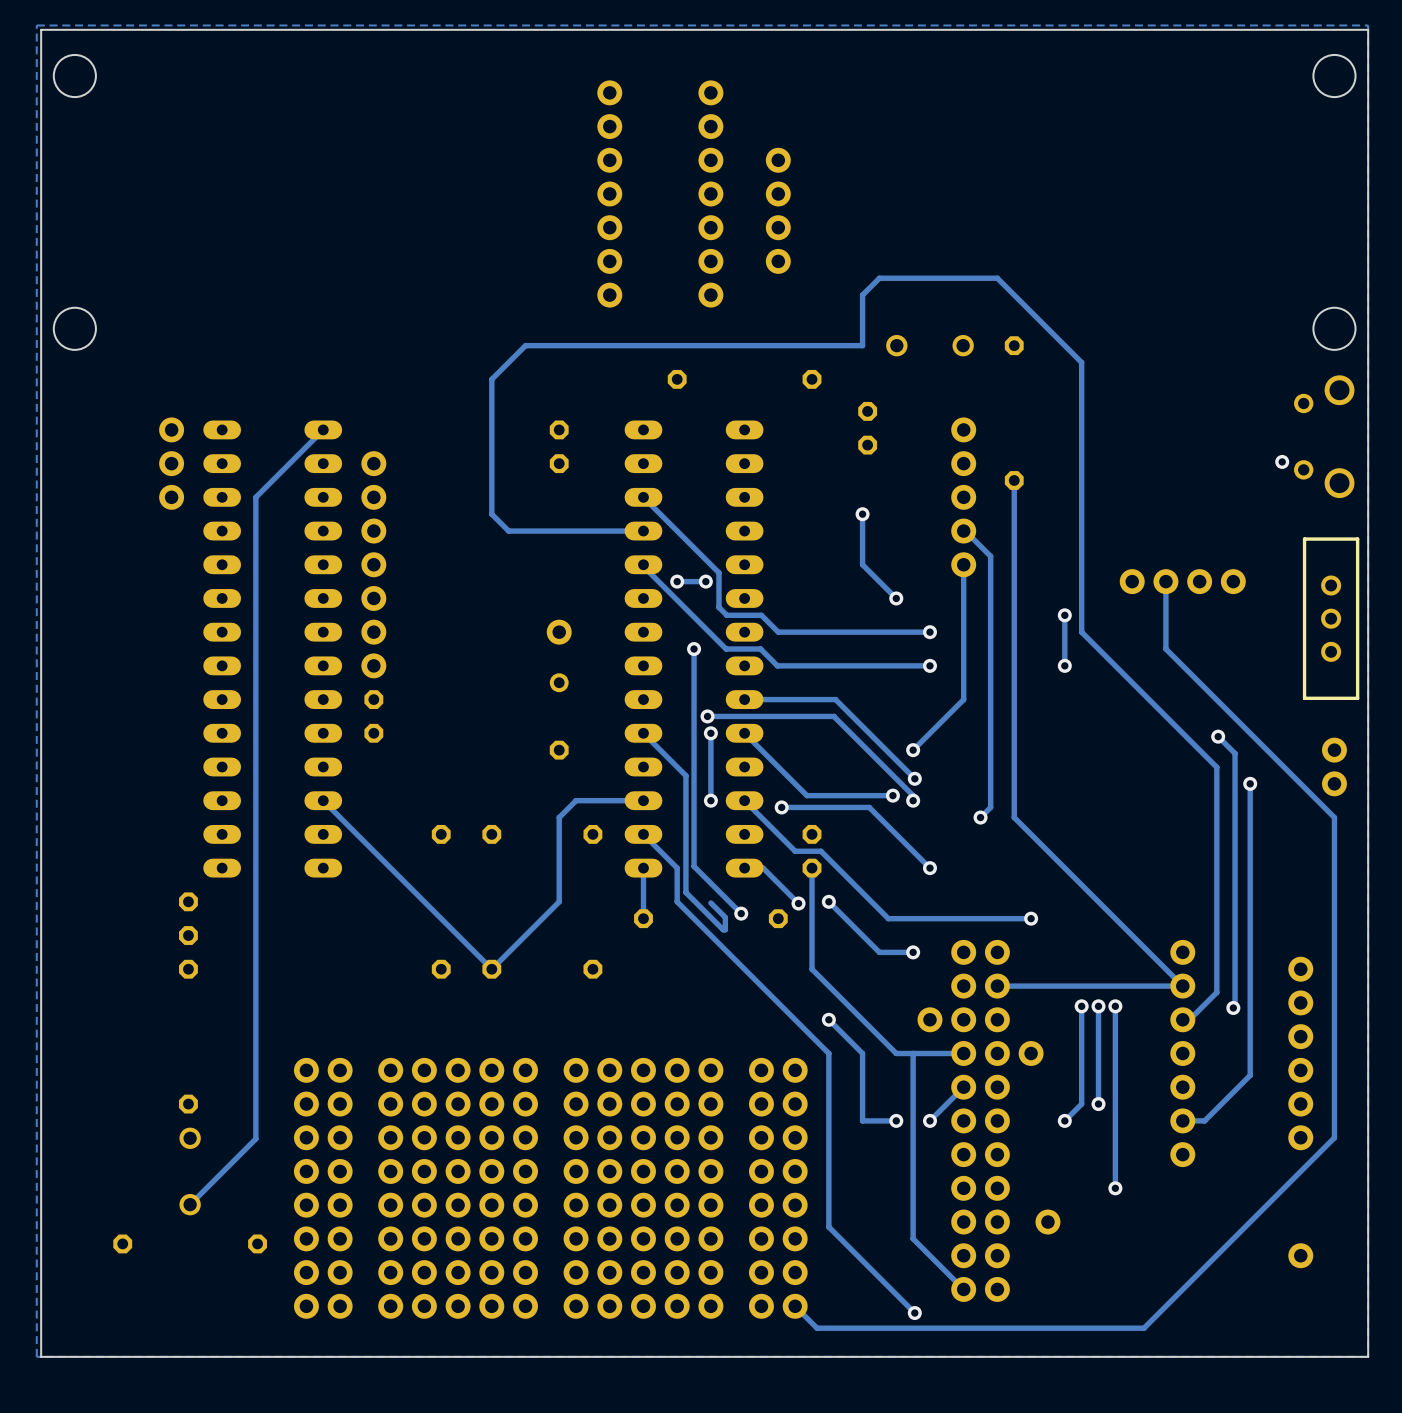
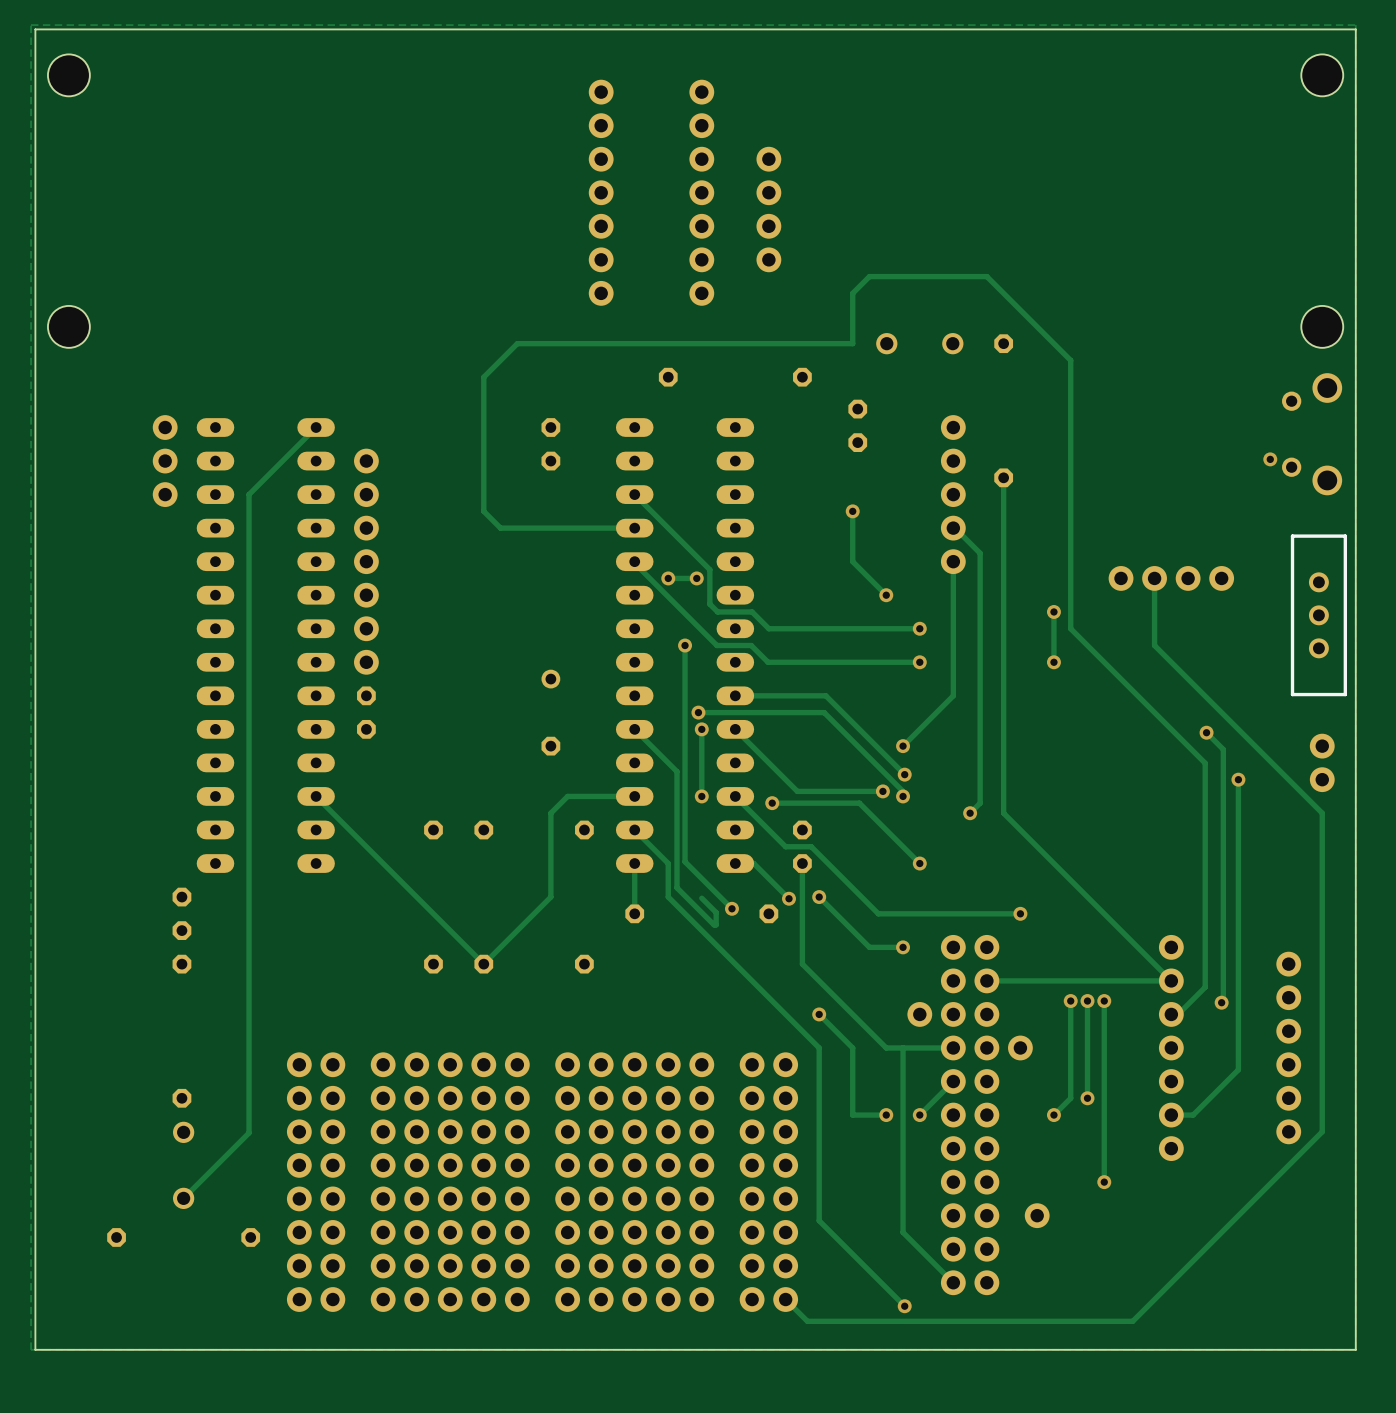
part: (559, 632) -> none
part: (1300, 1255) -> none

